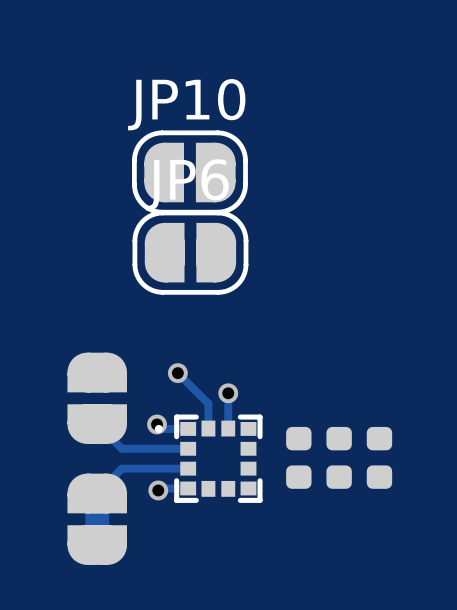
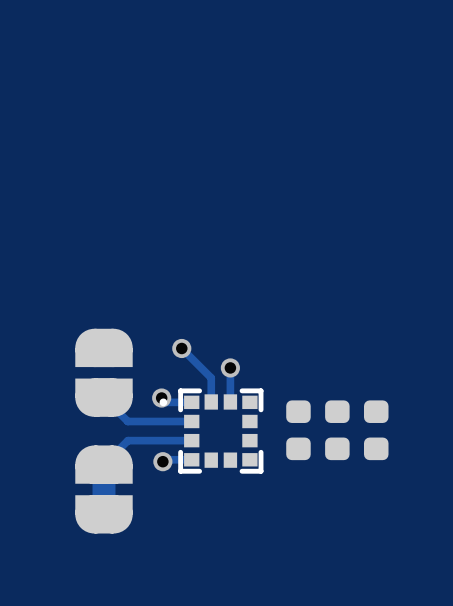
JP10: (189, 172) -> none
part: (190, 252) -> none

